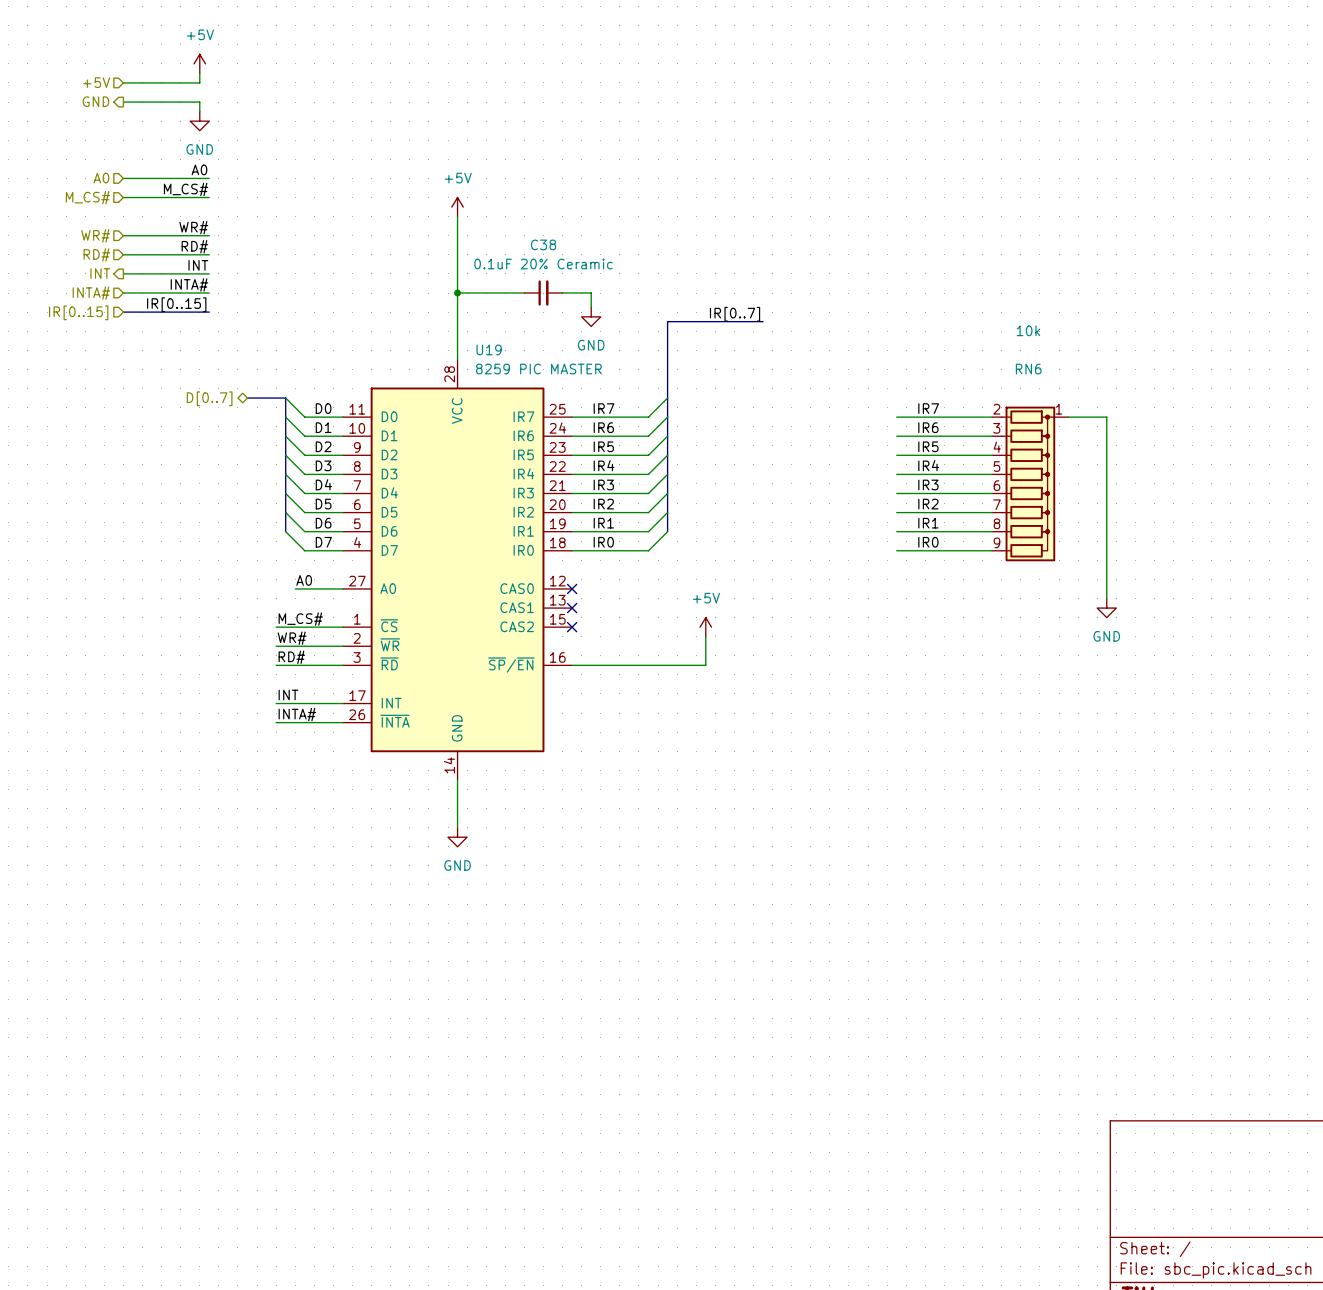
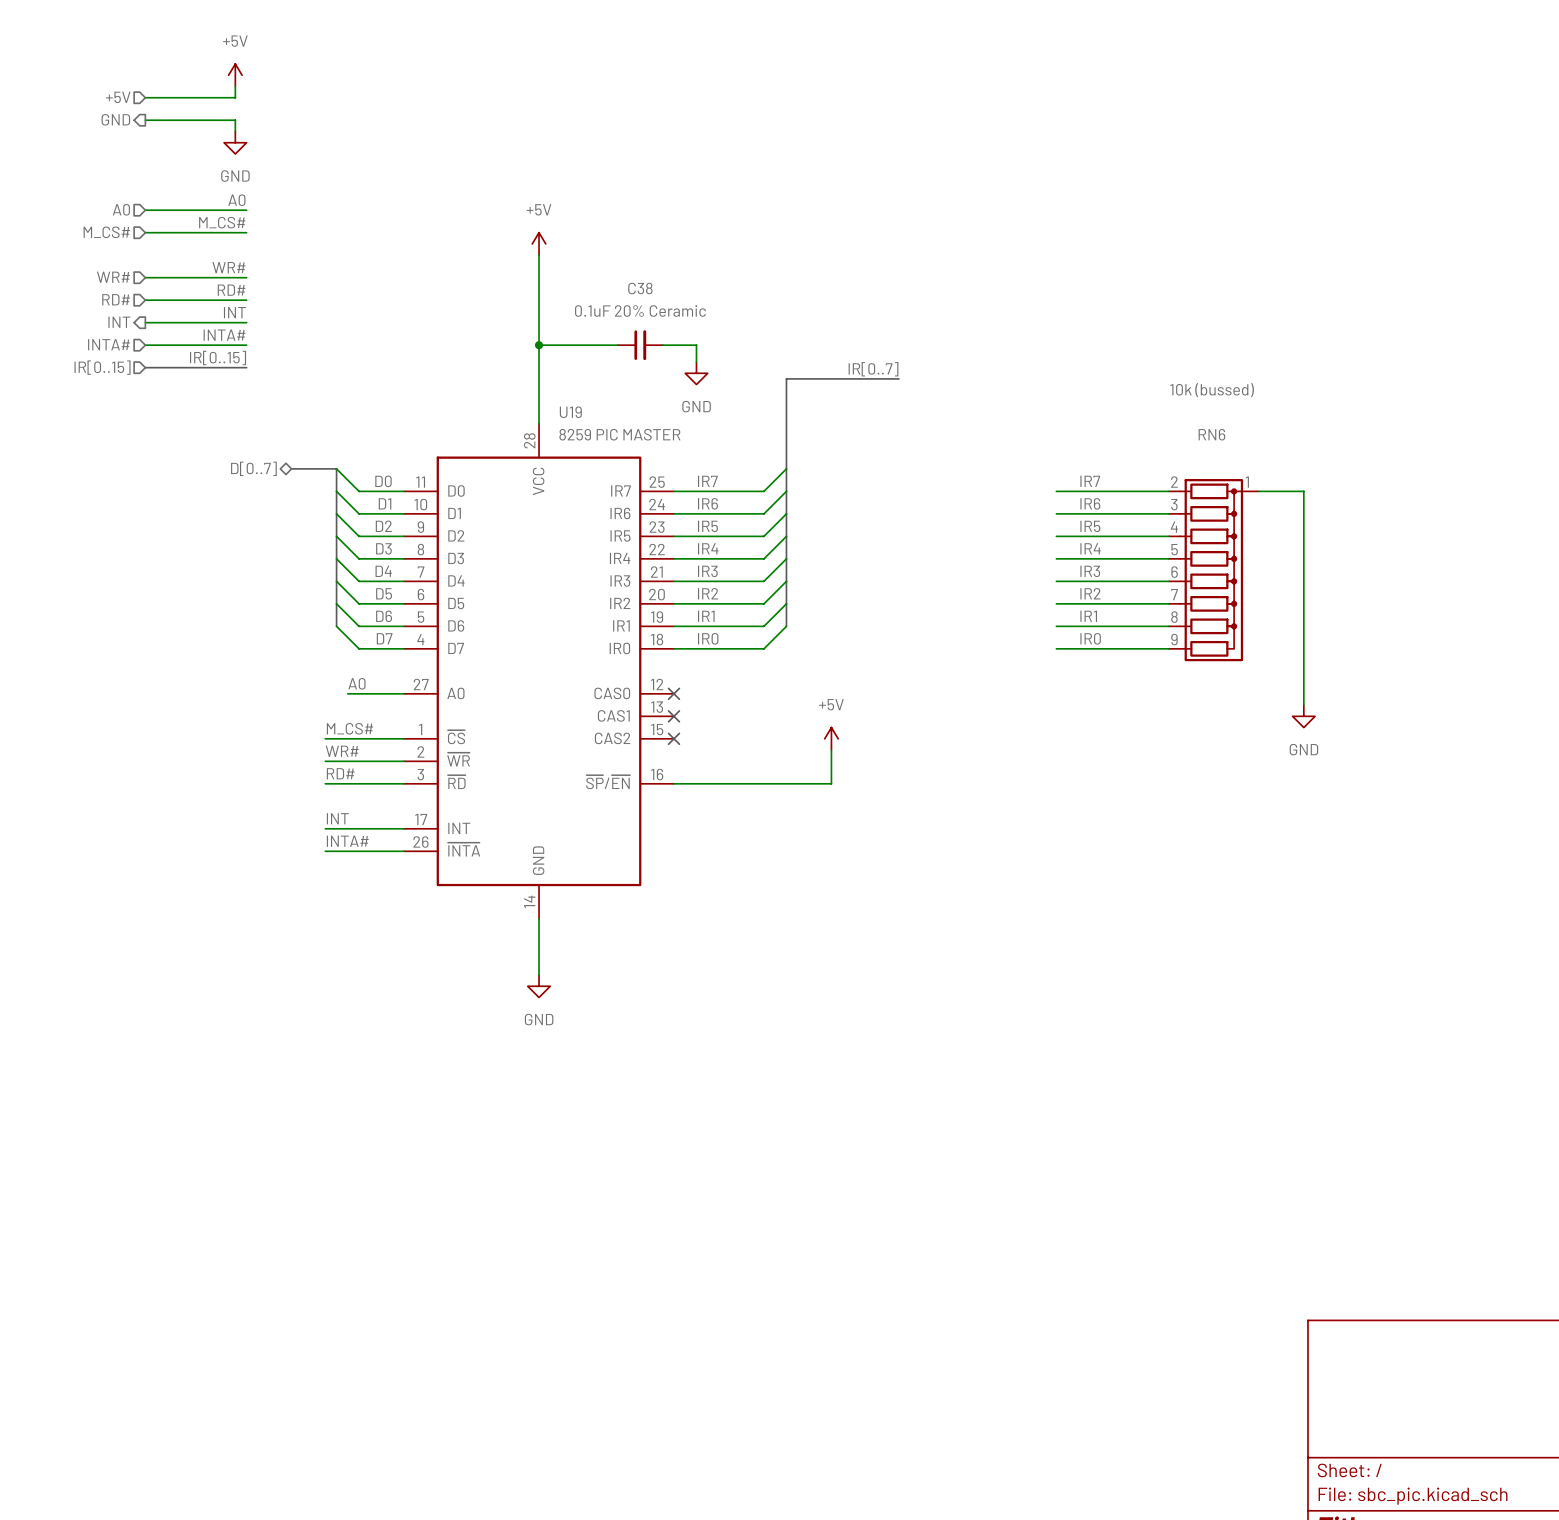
RN6 value: 10k (1028, 330) -> 10k (bussed) (1212, 390)

